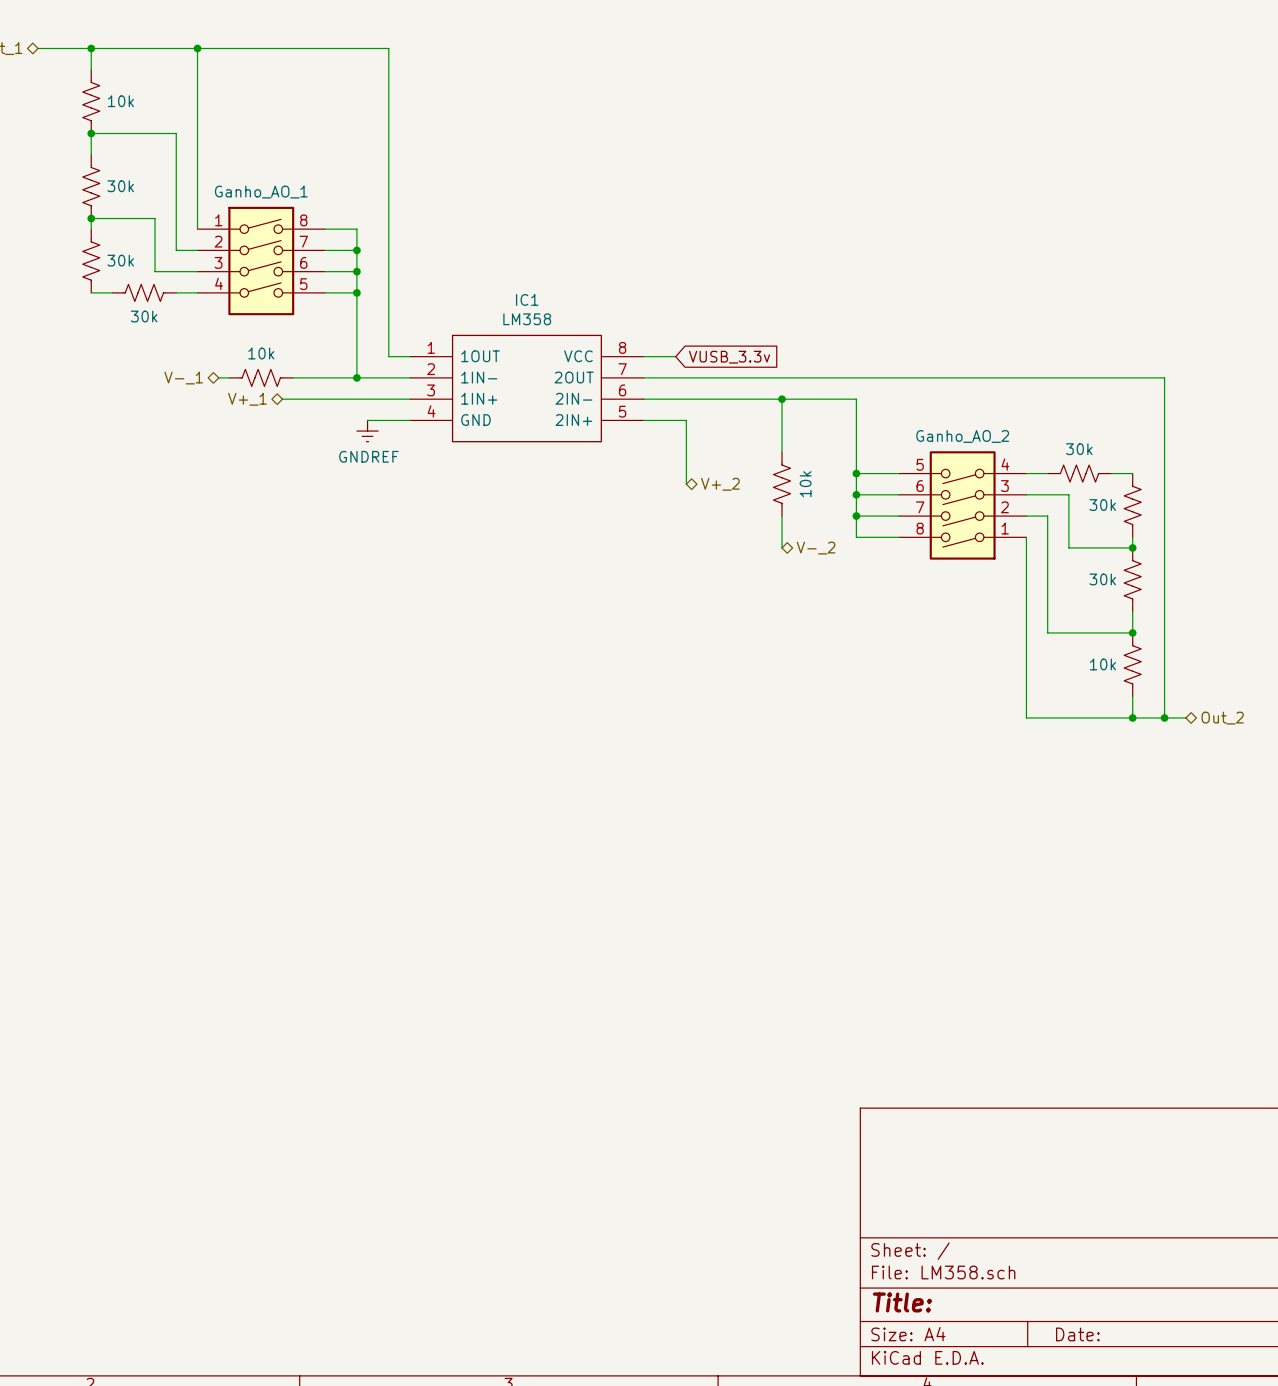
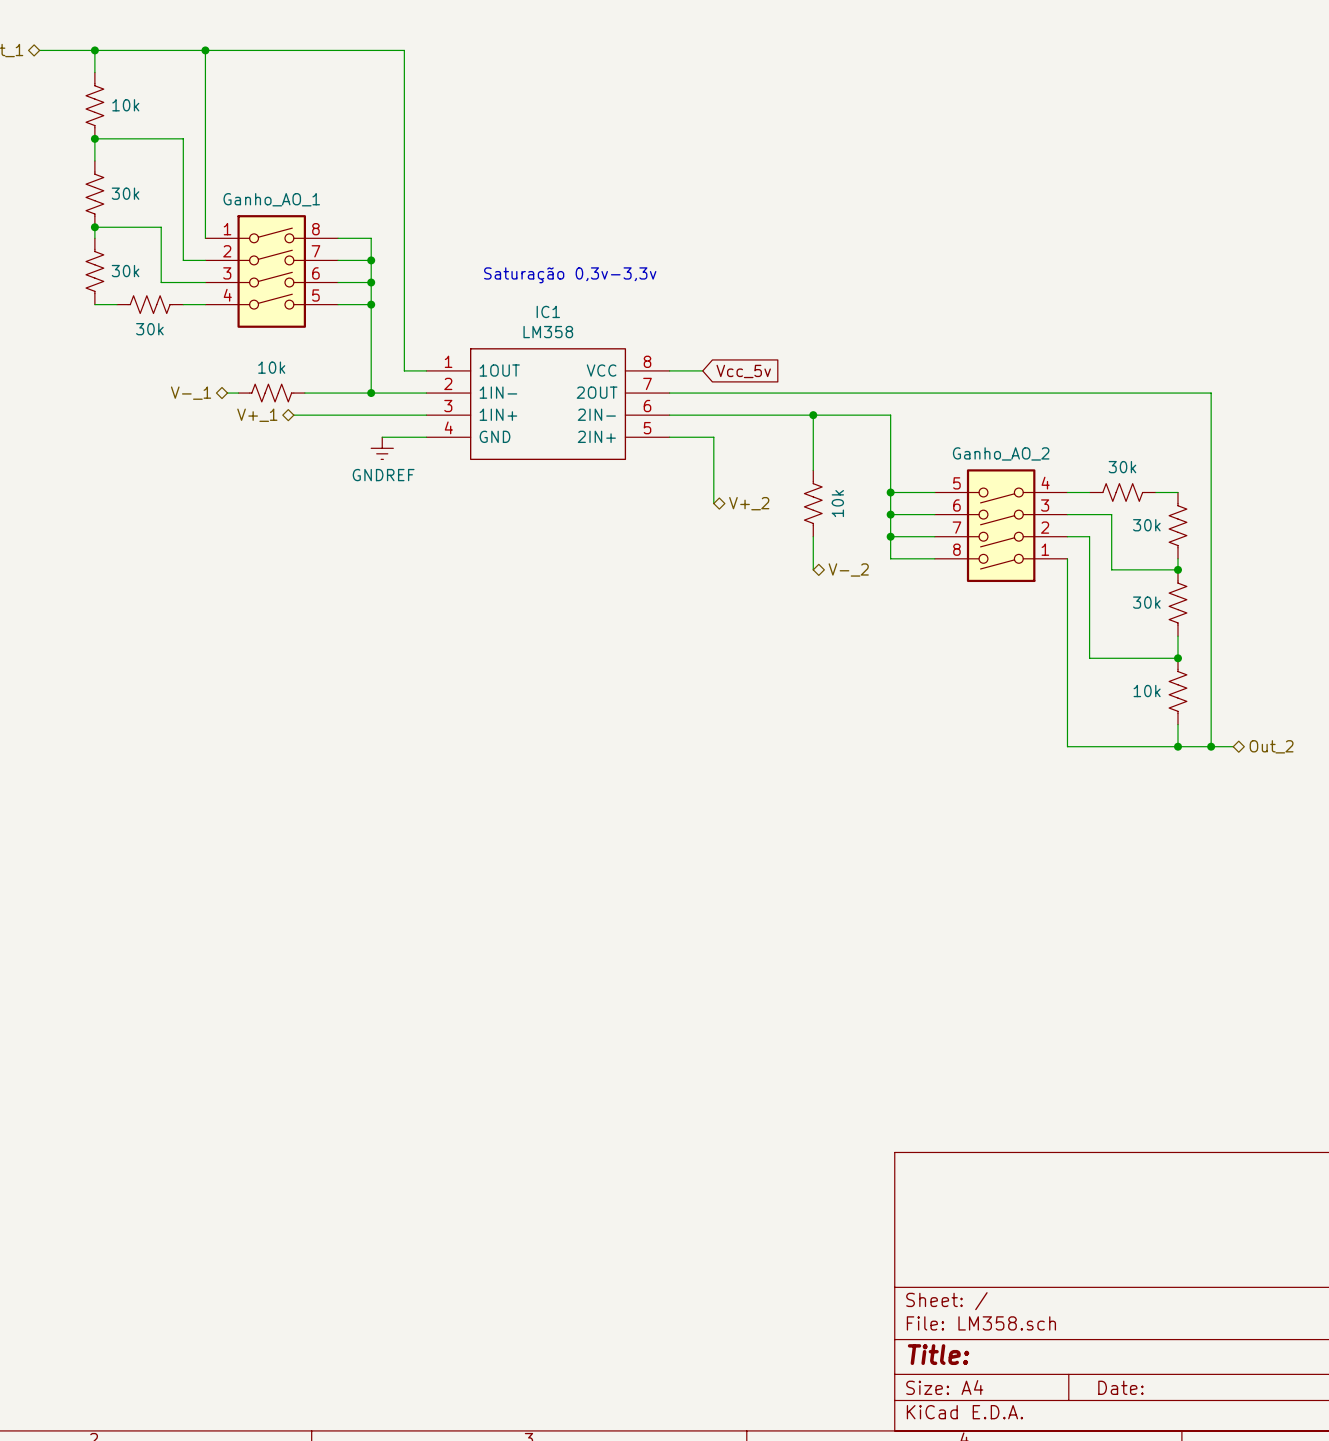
text: none -> Saturação 0,3v-3,3v (570, 275)
global label: VUSB_3.3v (729, 357) -> Vcc_5v (743, 371)

